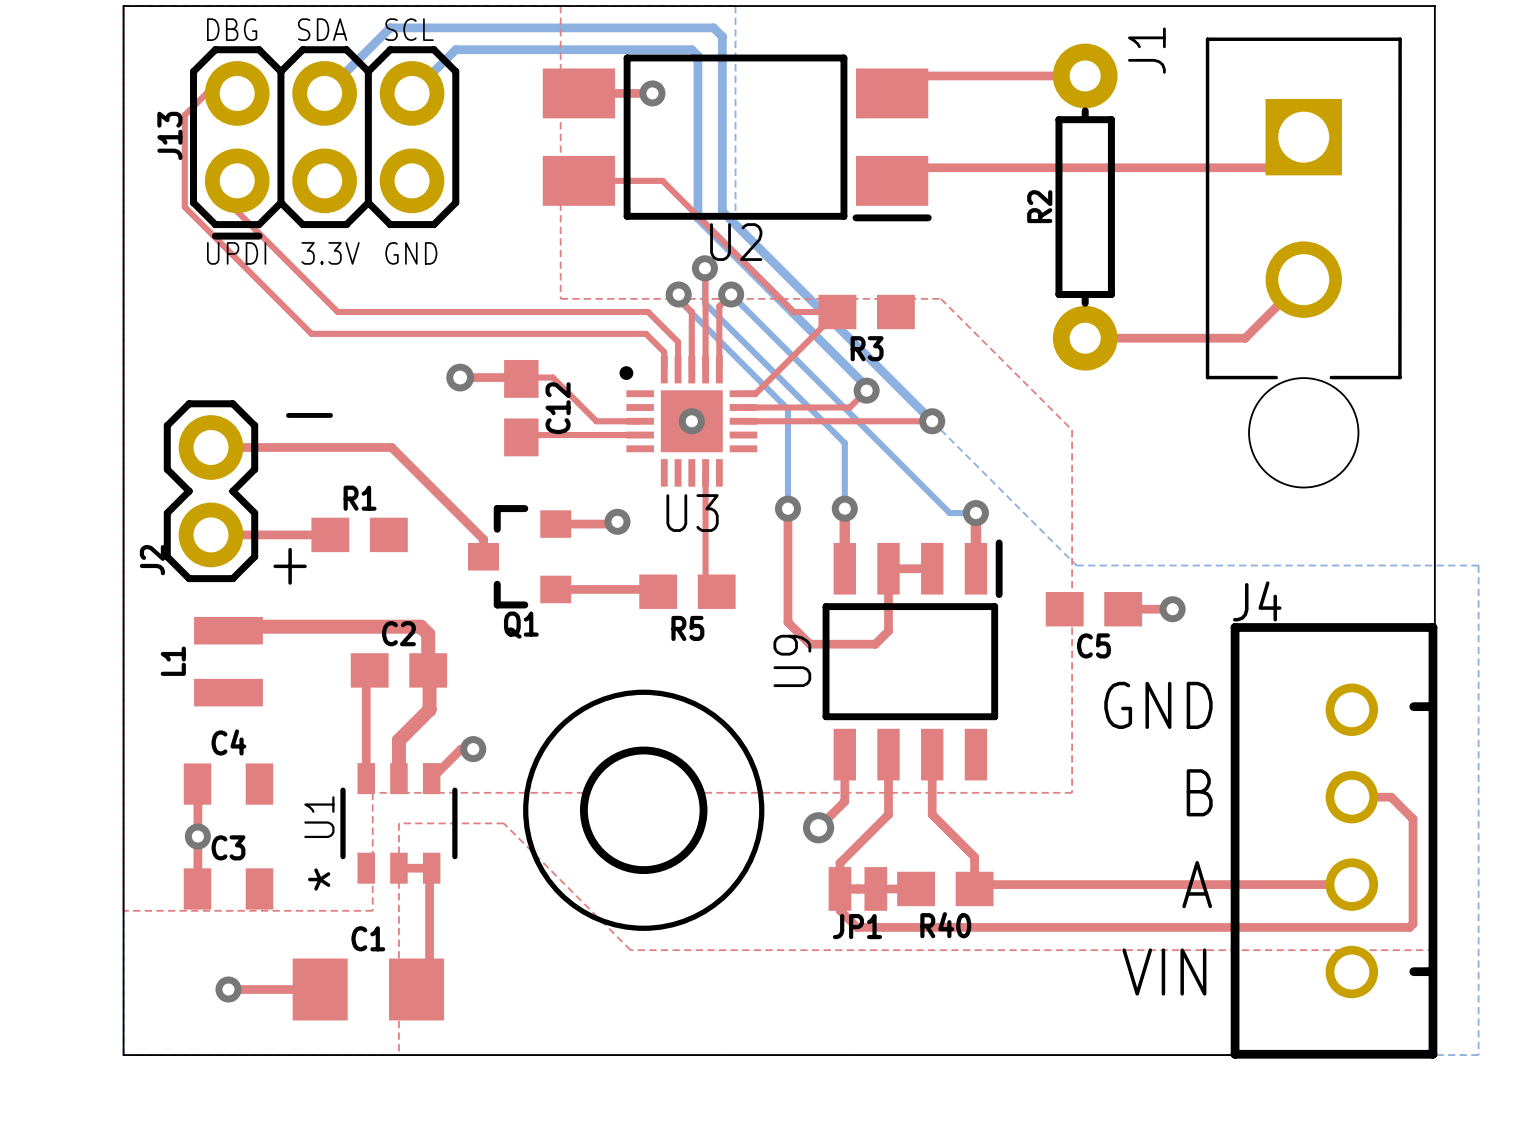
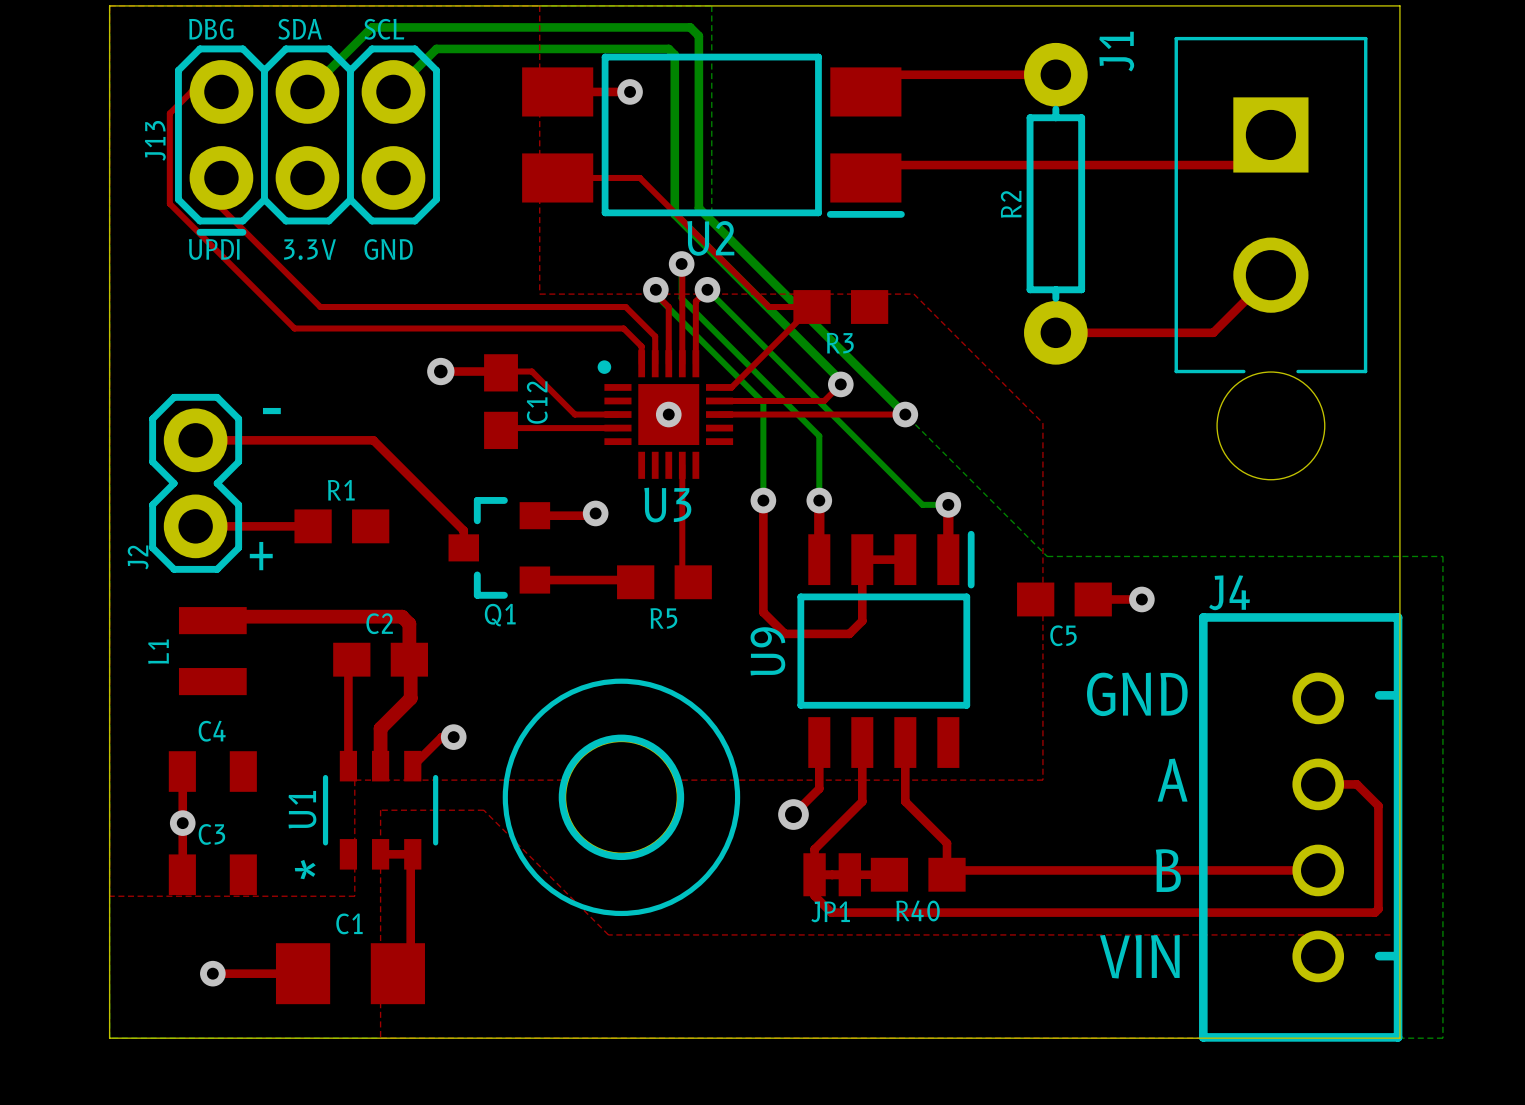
text: B (1199, 792) -> A (1172, 780)
text: A (1197, 884) -> B (1168, 870)

